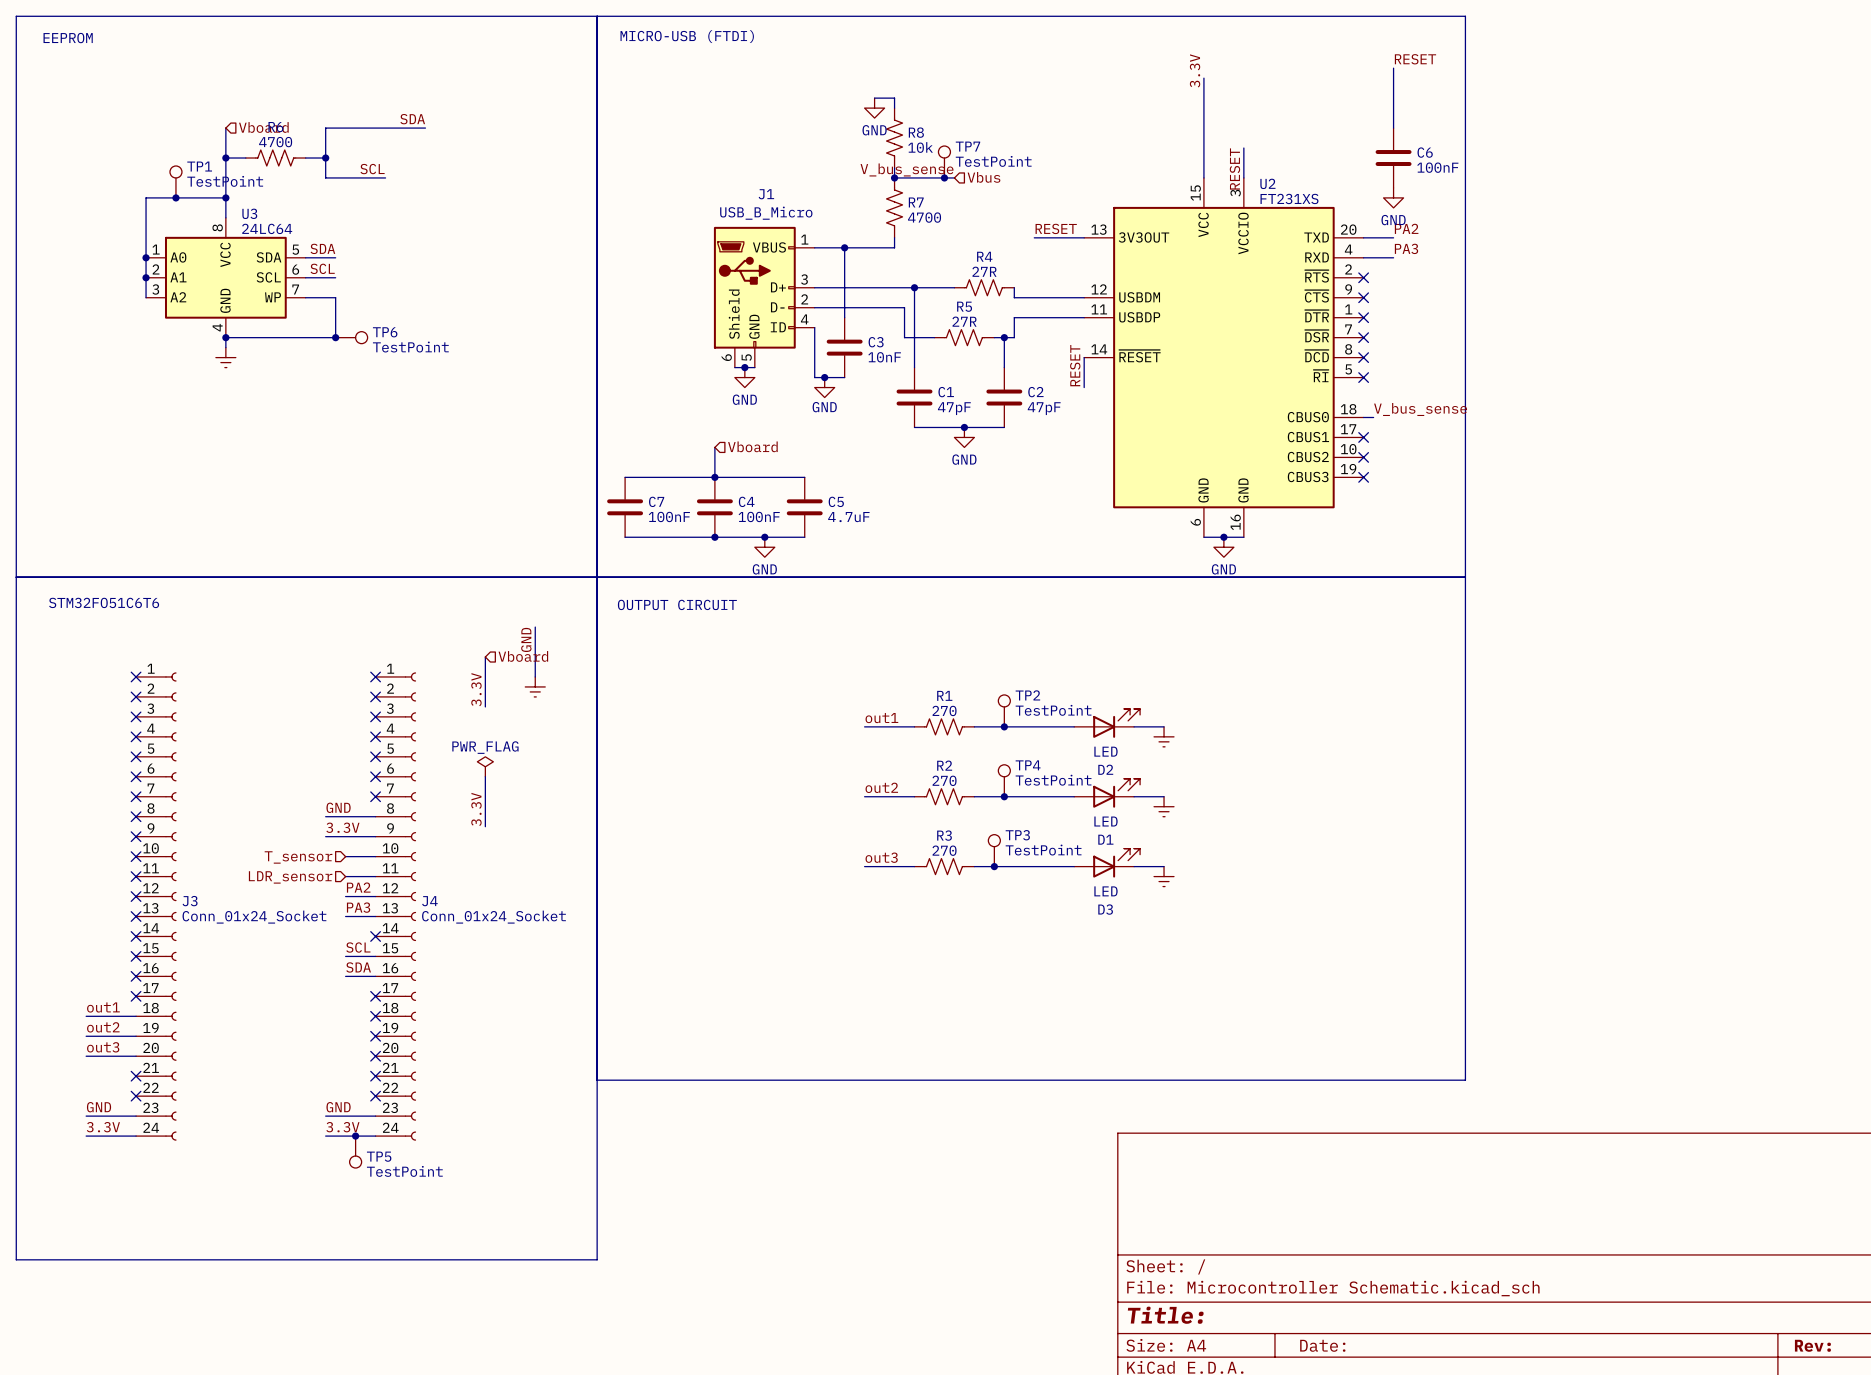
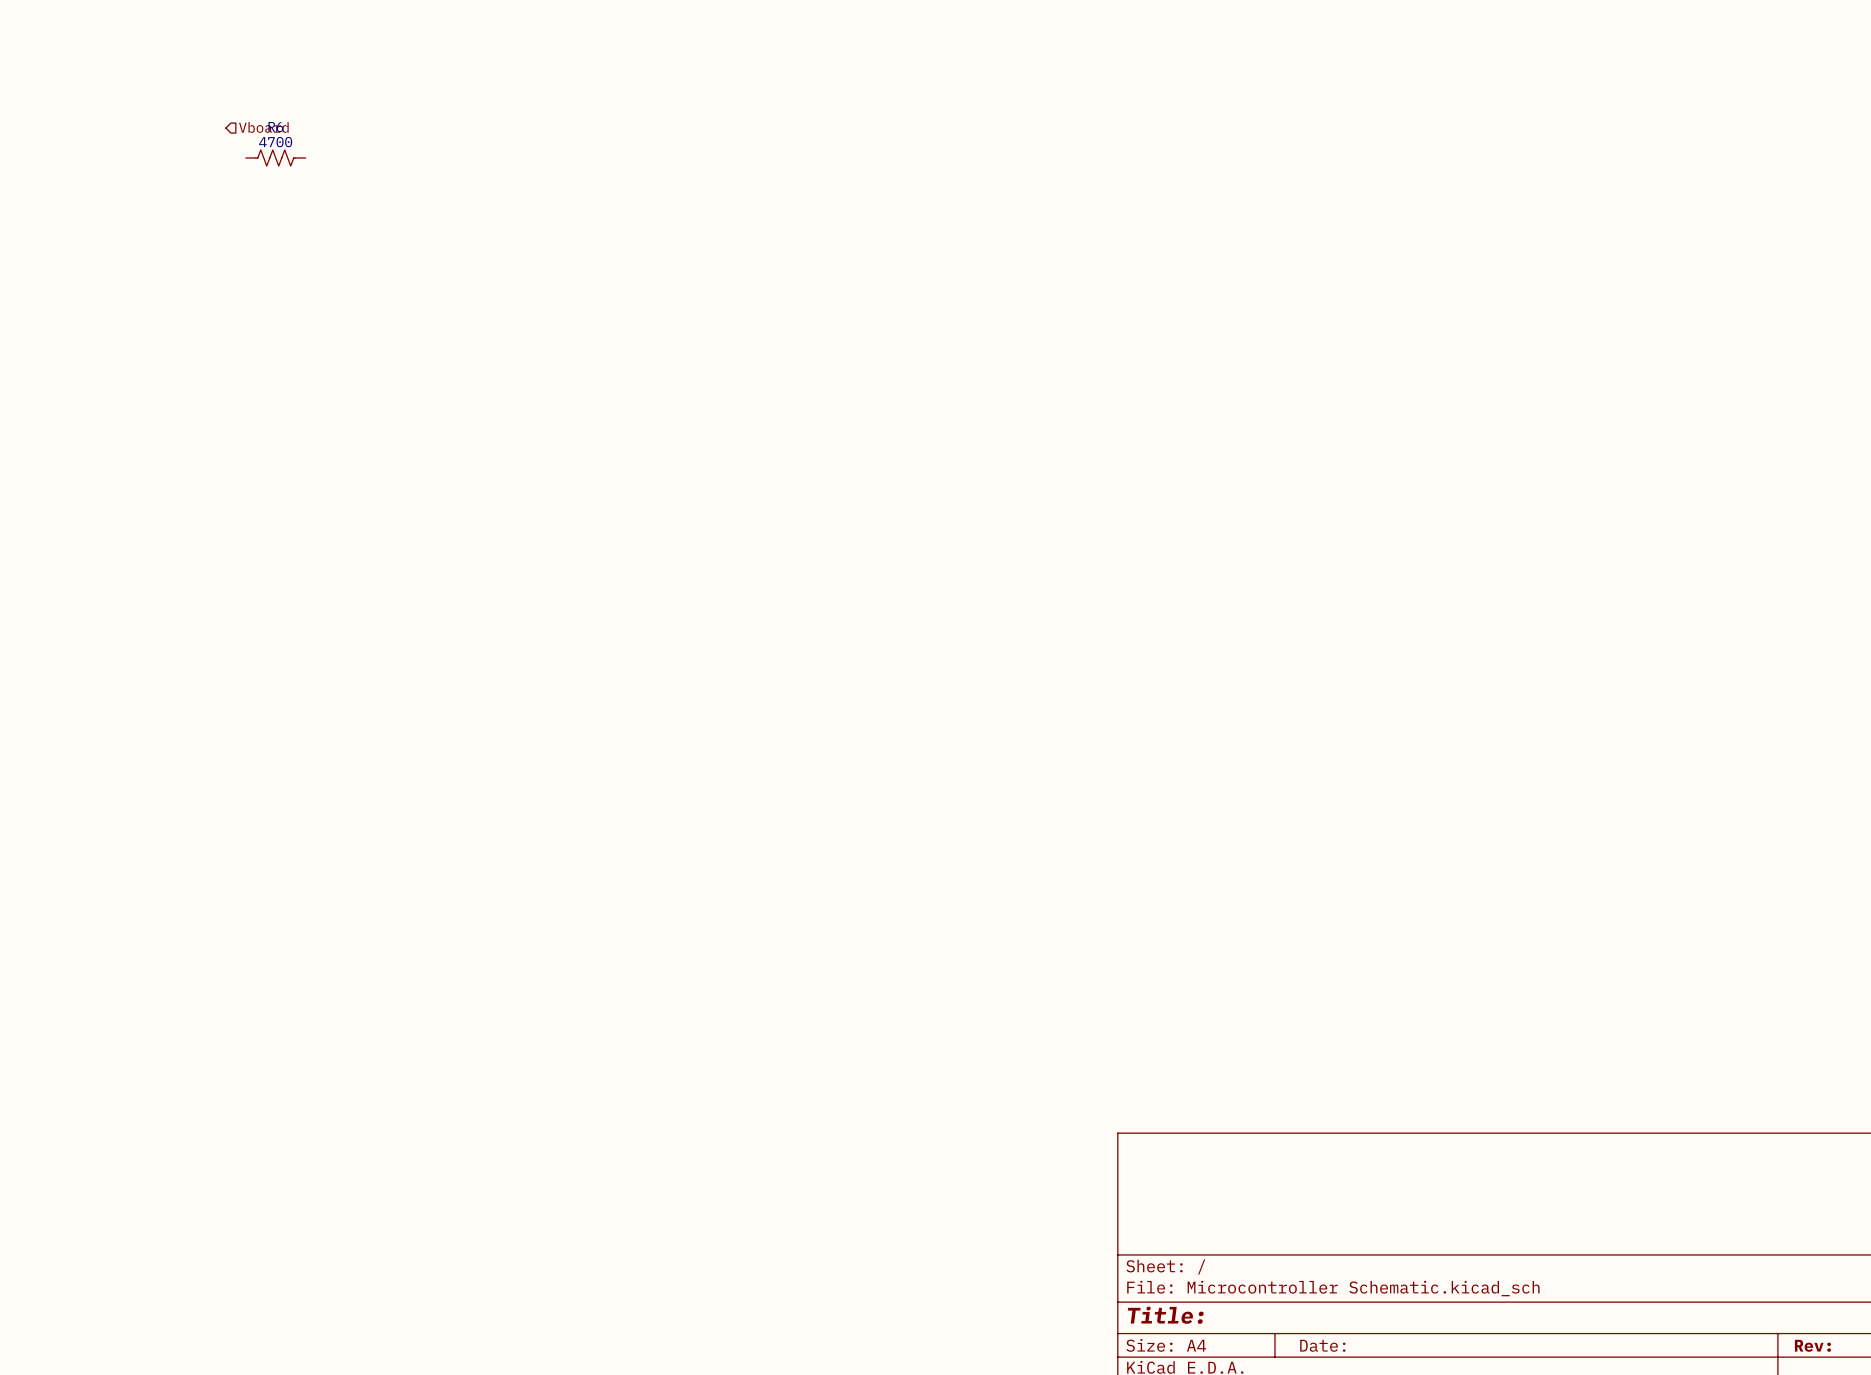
line: (597, 16) (597, 1259) (16, 1259) (16, 16) (1465, 16) (1465, 1080) (597, 1080) -> none
text: MICRO-USB (FTDI) (687, 36) -> none
text: EEPROM (68, 38) -> none
label: RESET (1415, 59) -> none
wire: (1393, 68) (1393, 128) -> none
label: 3.3V (1195, 70) -> none
wire: (1203, 78) (1203, 177) -> none
wire: (874, 98) (894, 98) (894, 108) -> none
power symbol: GND (874, 108) -> none
label: SDA (412, 119) -> none
wire: (225, 128) (225, 217) -> none
wire: (425, 128) (325, 128) (325, 177) (385, 177) -> none
R8: 10k (894, 138) -> none
wire: (1243, 148) (1243, 177) -> none
wire: (225, 158) (245, 158) -> none
junction: (225, 158) -> none
wire: (305, 158) (325, 158) -> none
junction: (325, 158) -> none
C6: 100nF (1393, 158) -> none
TP7: TestPoint (944, 161) -> none
wire: (894, 167) (894, 177) (954, 177) -> none
label: SCL (372, 169) -> none
label: V_bus_sense (907, 169) -> none
label: RESET (1234, 169) -> none
junction: (894, 177) -> none
junction: (944, 177) -> none
hierarchical label: Vbus (983, 177) -> none
TP1: TestPoint (175, 181) -> none
junction: (175, 197) -> none
wire: (225, 197) (146, 197) (146, 297) -> none
junction: (225, 197) -> none
power symbol: GND (1393, 197) -> none
R7: 4700 (894, 207) -> none
label: RESET (1056, 228) -> none
label: PA2 (1406, 228) -> none
wire: (894, 237) (894, 247) (814, 247) -> none
wire: (1034, 237) (1084, 237) -> none
wire: (1363, 237) (1393, 237) -> none
wire: (844, 247) (844, 317) -> none
junction: (844, 247) -> none
label: SDA (322, 248) -> none
label: PA3 (1406, 248) -> none
junction: (146, 257) -> none
wire: (305, 257) (335, 257) -> none
wire: (1363, 257) (1393, 257) -> none
label: SCL (322, 268) -> none
junction: (146, 277) -> none
U3: 24LC64 (225, 277) -> none
wire: (305, 277) (335, 277) -> none
no-connect mark: (1363, 277) -> none
wire: (814, 287) (954, 287) -> none
wire: (914, 287) (914, 367) -> none
junction: (914, 287) -> none
R4: 27R (984, 287) -> none
wire: (1014, 287) (1014, 297) (1084, 297) -> none
wire: (305, 297) (335, 297) (335, 337) (225, 337) (225, 347) -> none
J1: USB_B_Micro (764, 297) -> none
no-connect mark: (1363, 297) -> none
wire: (814, 307) (904, 307) (904, 337) (934, 337) -> none
wire: (1084, 317) (1014, 317) (1014, 337) (994, 337) -> none
no-connect mark: (1363, 317) -> none
wire: (814, 327) (814, 377) (844, 377) -> none
junction: (225, 337) -> none
junction: (335, 337) -> none
TP6: TestPoint (351, 337) -> none
R5: 27R (964, 337) -> none
wire: (1004, 337) (1004, 367) -> none
junction: (1004, 337) -> none
no-connect mark: (1363, 337) -> none
C3: 10nF (844, 347) -> none
power symbol: (225, 357) -> none
wire: (1084, 357) (1084, 387) -> none
U2: FT231XS (1223, 357) -> none
no-connect mark: (1363, 357) -> none
label: RESET (1075, 365) -> none
wire: (734, 367) (754, 367) -> none
junction: (744, 367) -> none
power symbol: GND (744, 377) -> none
junction: (824, 377) -> none
no-connect mark: (1363, 377) -> none
power symbol: GND (824, 387) -> none
C1: 47pF (914, 397) -> none
C2: 47pF (1004, 397) -> none
label: V_bus_sense (1420, 409) -> none
wire: (1363, 417) (1373, 417) -> none
wire: (914, 427) (1004, 427) -> none
junction: (964, 427) -> none
power symbol: GND (964, 437) -> none
no-connect mark: (1363, 437) -> none
hierarchical label: Vboard (752, 446) -> none
wire: (714, 447) (714, 477) -> none
no-connect mark: (1363, 457) -> none
wire: (625, 477) (804, 477) -> none
junction: (714, 477) -> none
no-connect mark: (1363, 477) -> none
C7: 100nF (625, 507) -> none
C4: 100nF (714, 507) -> none
C5: 4.7uF (804, 507) -> none
wire: (625, 537) (804, 537) -> none
junction: (714, 537) -> none
junction: (764, 537) -> none
wire: (1203, 537) (1243, 537) -> none
junction: (1223, 537) -> none
power symbol: GND (764, 547) -> none
power symbol: GND (1223, 547) -> none
line: (16, 577) (1465, 577) -> none
text: STM32FO51C6T6 (104, 602) -> none
text: OUTPUT CIRCUIT (677, 604) -> none
wire: (535, 627) (535, 676) -> none
label: GND (526, 639) -> none
hierarchical label: Vboard (523, 656) -> none
wire: (485, 657) (485, 706) -> none
no-connect mark: (136, 676) -> none
no-connect mark: (375, 676) -> none
power symbol: (535, 686) -> none
label: 3.3V (476, 689) -> none
no-connect mark: (136, 696) -> none
no-connect mark: (375, 696) -> none
TP2: TestPoint (1004, 710) -> none
no-connect mark: (136, 716) -> none
no-connect mark: (375, 716) -> none
label: out1 (881, 718) -> none
D2: LED (1107, 723) -> none
wire: (864, 726) (914, 726) -> none
R1: 270 (944, 726) -> none
wire: (974, 726) (1074, 726) -> none
junction: (1004, 726) -> none
wire: (1134, 726) (1164, 726) -> none
no-connect mark: (136, 736) -> none
no-connect mark: (375, 736) -> none
power symbol: (1164, 736) -> none
no-connect mark: (136, 756) -> none
no-connect mark: (375, 756) -> none
power symbol: PWR_FLAG (485, 766) -> none
no-connect mark: (136, 776) -> none
no-connect mark: (375, 776) -> none
wire: (485, 776) (485, 826) -> none
TP4: TestPoint (1004, 780) -> none
label: out2 (881, 787) -> none
D1: LED (1107, 793) -> none
no-connect mark: (136, 796) -> none
no-connect mark: (375, 796) -> none
wire: (864, 796) (914, 796) -> none
R2: 270 (944, 796) -> none
wire: (974, 796) (1074, 796) -> none
junction: (1004, 796) -> none
wire: (1134, 796) (1164, 796) -> none
power symbol: (1164, 806) -> none
label: GND (338, 807) -> none
label: 3.3V (476, 809) -> none
no-connect mark: (136, 816) -> none
wire: (325, 816) (375, 816) -> none
label: 3.3V (342, 827) -> none
no-connect mark: (136, 836) -> none
wire: (325, 836) (375, 836) -> none
TP3: TestPoint (994, 850) -> none
no-connect mark: (136, 856) -> none
wire: (345, 856) (375, 856) -> none
hierarchical label: T_sensor (298, 857) -> none
label: out3 (881, 857) -> none
D3: LED (1107, 863) -> none
wire: (864, 866) (914, 866) -> none
R3: 270 (944, 866) -> none
wire: (974, 866) (1074, 866) -> none
junction: (994, 866) -> none
wire: (1134, 866) (1164, 866) -> none
no-connect mark: (136, 876) -> none
wire: (345, 876) (375, 876) -> none
power symbol: (1164, 876) -> none
hierarchical label: LDR_sensor (290, 877) -> none
label: PA2 (358, 887) -> none
no-connect mark: (136, 896) -> none
wire: (345, 896) (375, 896) -> none
J3: Conn_01x24_Socket (156, 906) -> none
J4: Conn_01x24_Socket (395, 906) -> none
label: PA3 (358, 907) -> none
no-connect mark: (136, 916) -> none
wire: (345, 916) (375, 916) -> none
no-connect mark: (136, 936) -> none
no-connect mark: (375, 936) -> none
label: SCL (358, 947) -> none
no-connect mark: (136, 956) -> none
wire: (345, 956) (375, 956) -> none
label: SDA (358, 967) -> none
no-connect mark: (136, 976) -> none
wire: (345, 976) (375, 976) -> none
no-connect mark: (136, 996) -> none
no-connect mark: (375, 996) -> none
label: out1 (103, 1007) -> none
wire: (86, 1016) (136, 1016) -> none
no-connect mark: (375, 1016) -> none
label: out2 (103, 1027) -> none
wire: (86, 1036) (136, 1036) -> none
no-connect mark: (375, 1036) -> none
label: out3 (103, 1047) -> none
wire: (86, 1056) (136, 1056) -> none
no-connect mark: (375, 1056) -> none
no-connect mark: (136, 1076) -> none
no-connect mark: (375, 1076) -> none
no-connect mark: (136, 1096) -> none
no-connect mark: (375, 1096) -> none
label: GND (99, 1107) -> none
label: GND (338, 1107) -> none
wire: (86, 1116) (136, 1116) -> none
wire: (325, 1116) (375, 1116) -> none
label: 3.3V (103, 1127) -> none
label: 3.3V (342, 1127) -> none
wire: (86, 1136) (136, 1136) -> none
wire: (325, 1136) (375, 1136) -> none
junction: (355, 1136) -> none
TP5: TestPoint (355, 1152) -> none

